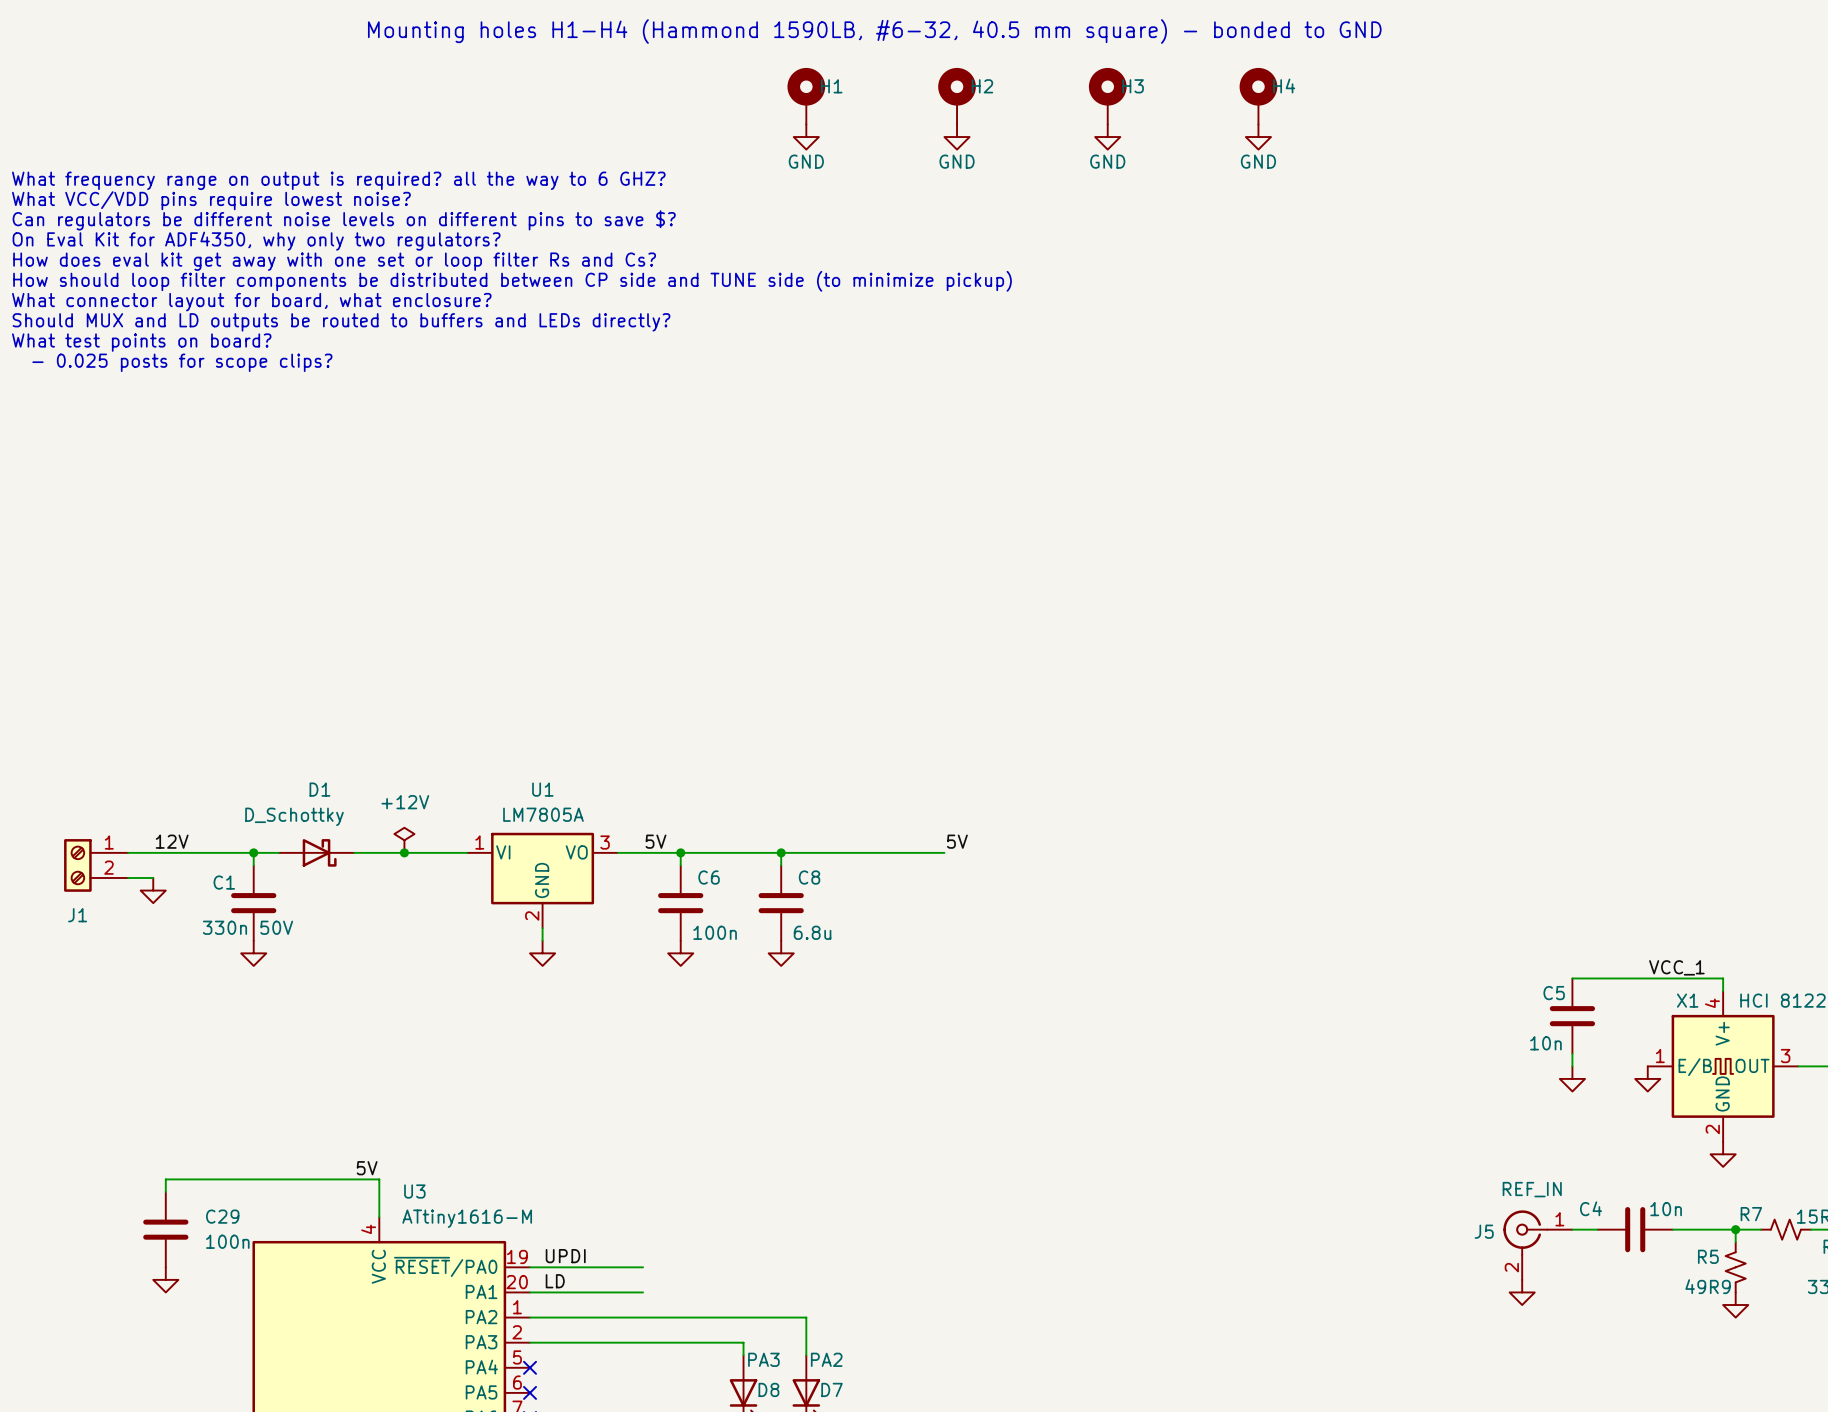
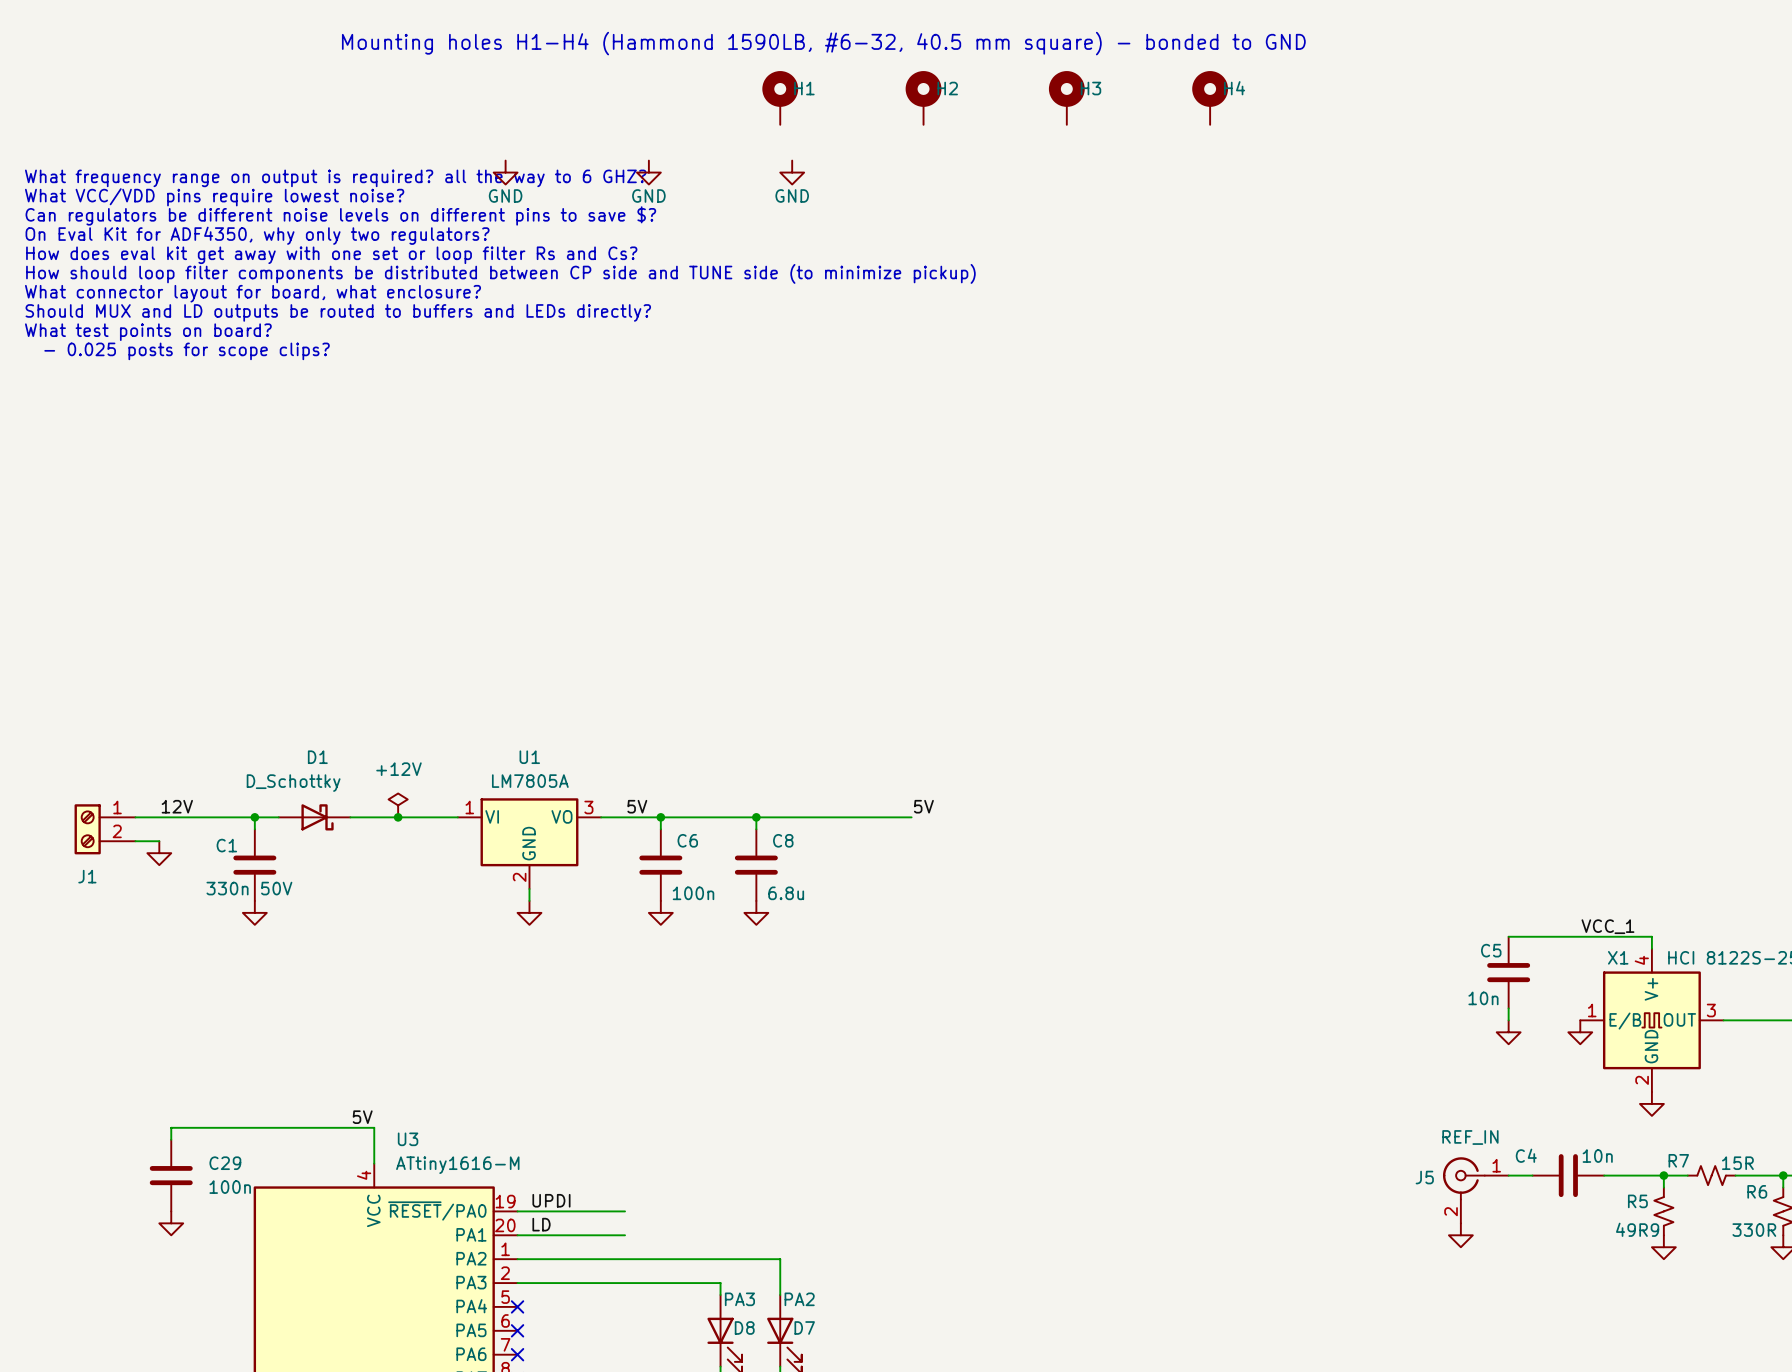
text position: Mounting holes H1-H4 (Hammond 1590LB, #6-32, 40.5 mm square) - bonded to GND (874, 31) -> Mounting holes H1-H4 (Hammond 1590LB, #6-32, 40.5 mm square) - bonded to GND (823, 43)
power symbol position: GND (806, 137) -> GND (792, 172)
power symbol: GND (957, 137) -> none
power symbol: GND (1107, 137) -> none
power symbol: GND (1258, 137) -> none
power symbol: none -> GND (505, 172)
power symbol: none -> GND (648, 172)

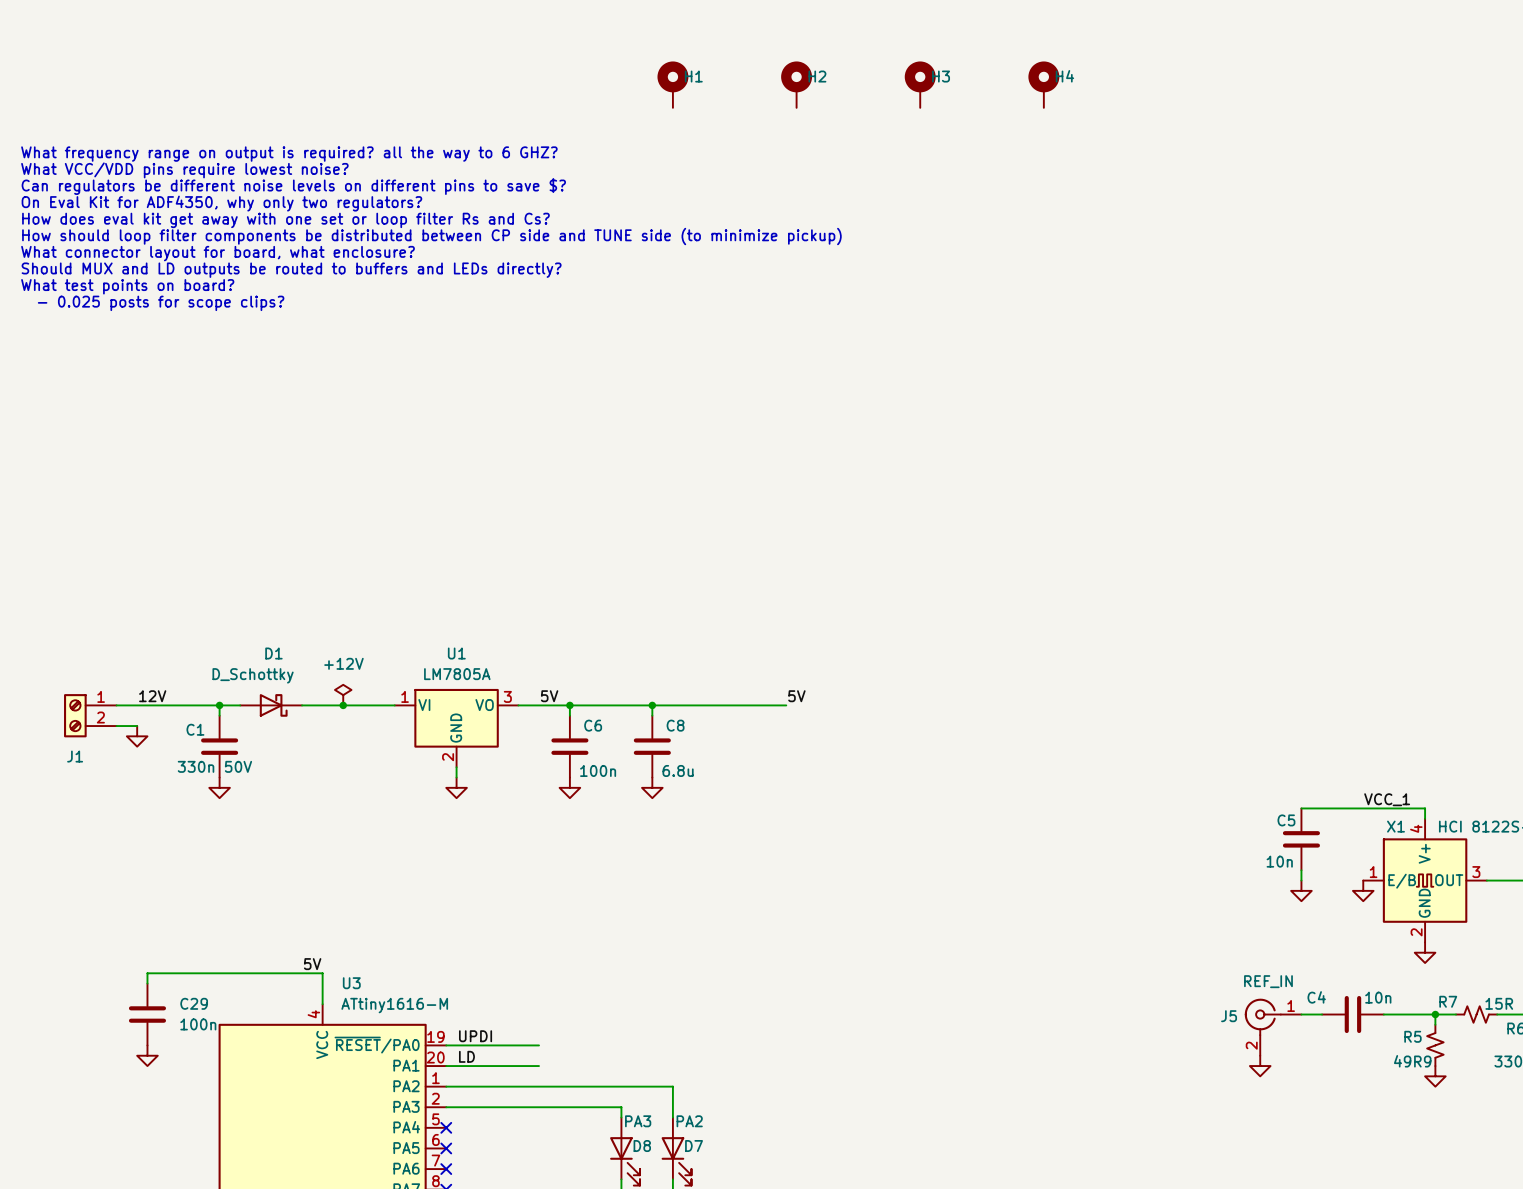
text: Mounting holes H1-H4 (Hammond 1590LB, #6-32, 40.5 mm square) - bonded to GND (823, 43) -> none
power symbol: GND (505, 172) -> none
power symbol: GND (648, 172) -> none
power symbol: GND (792, 172) -> none

